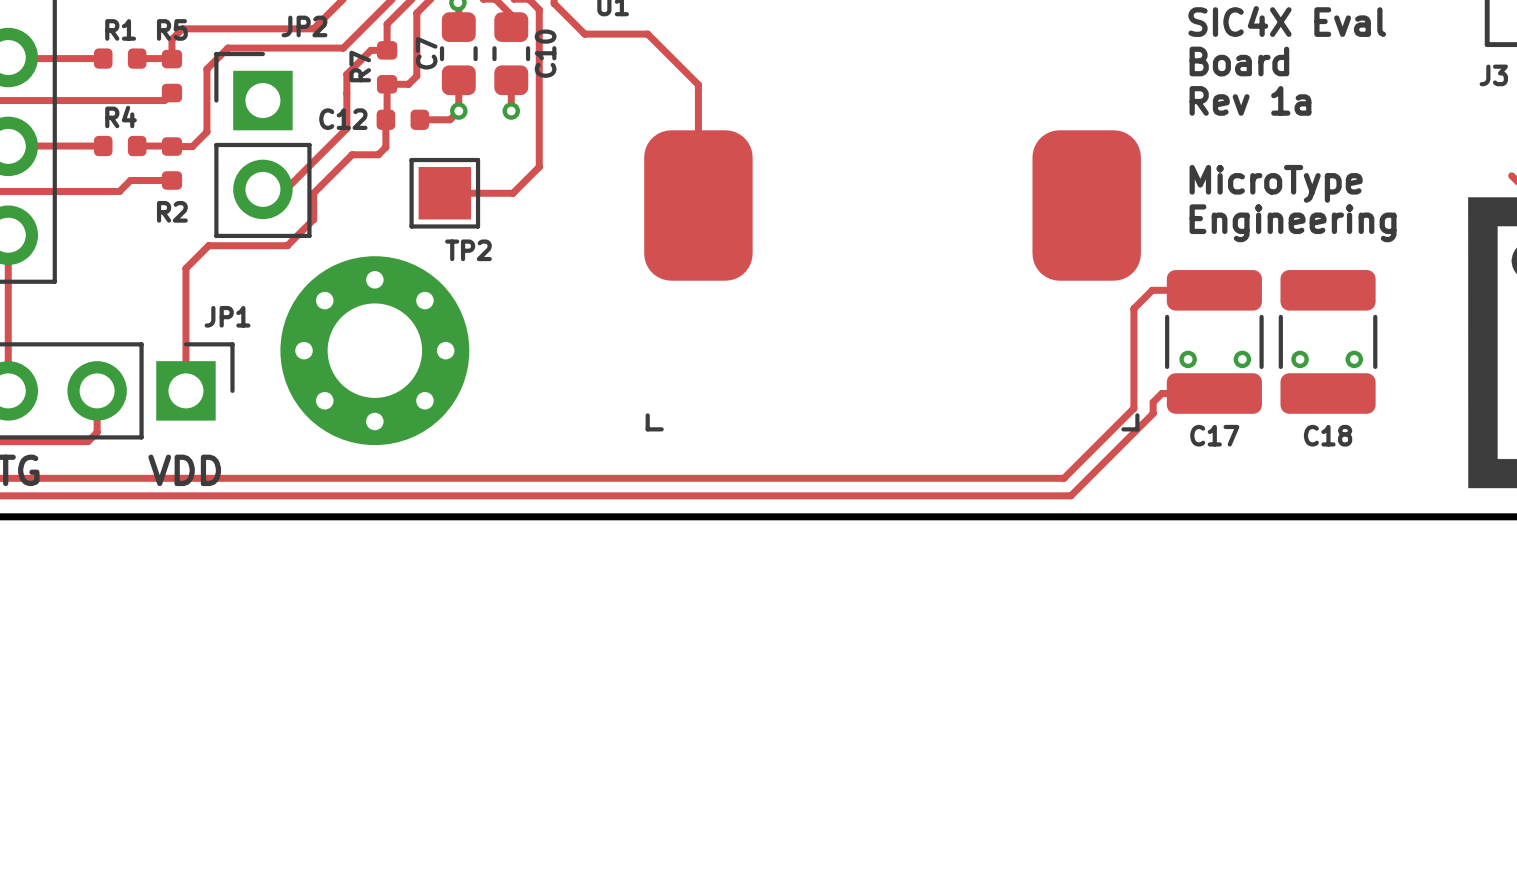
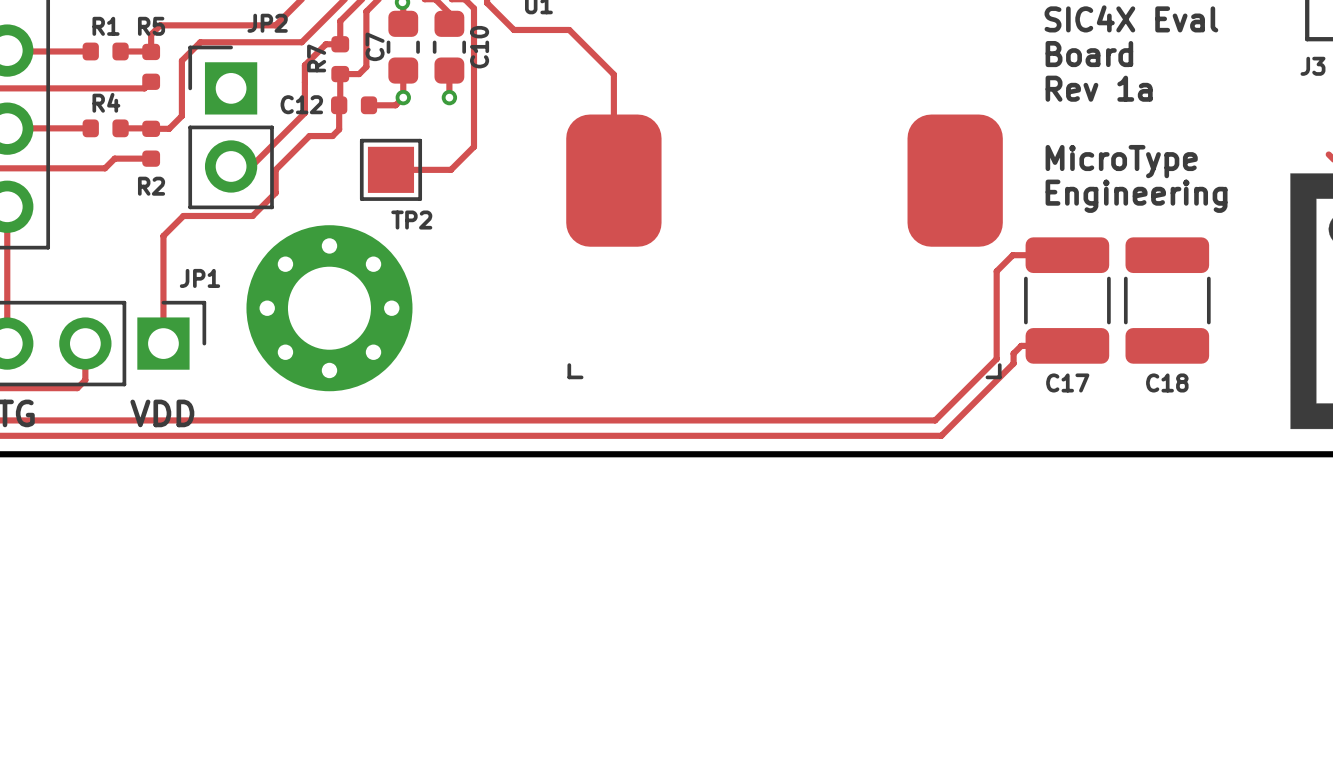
via: (1188, 359) -> none
via: (1242, 359) -> none
via: (1300, 359) -> none
via: (1354, 359) -> none

